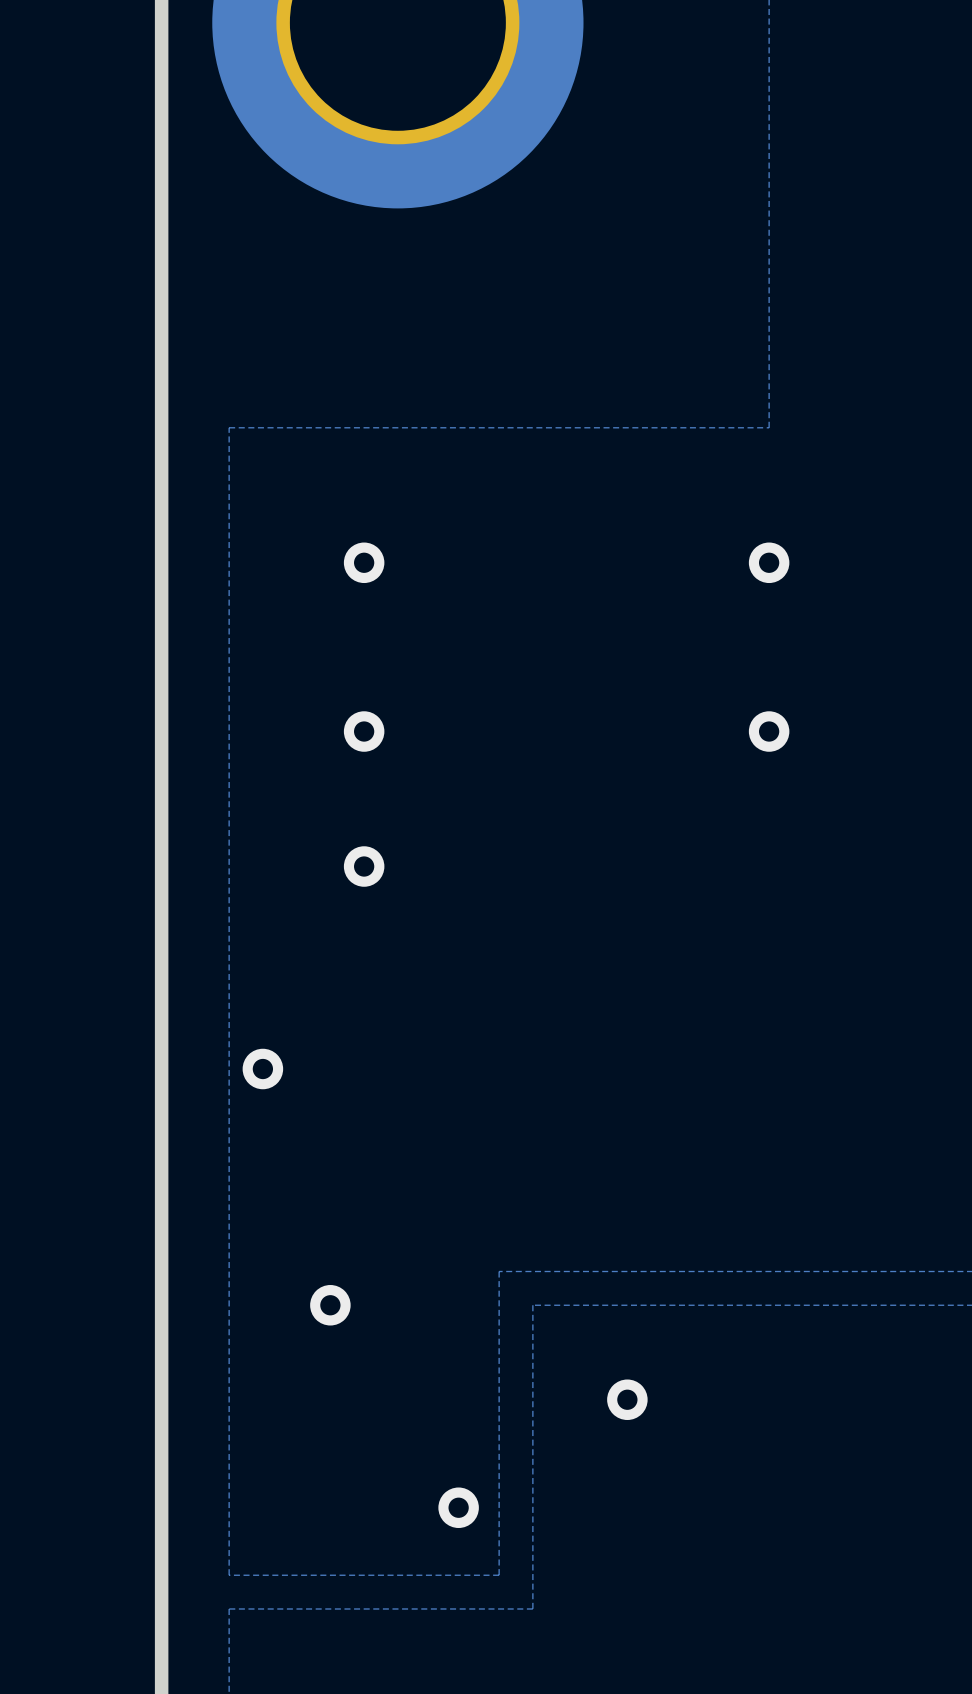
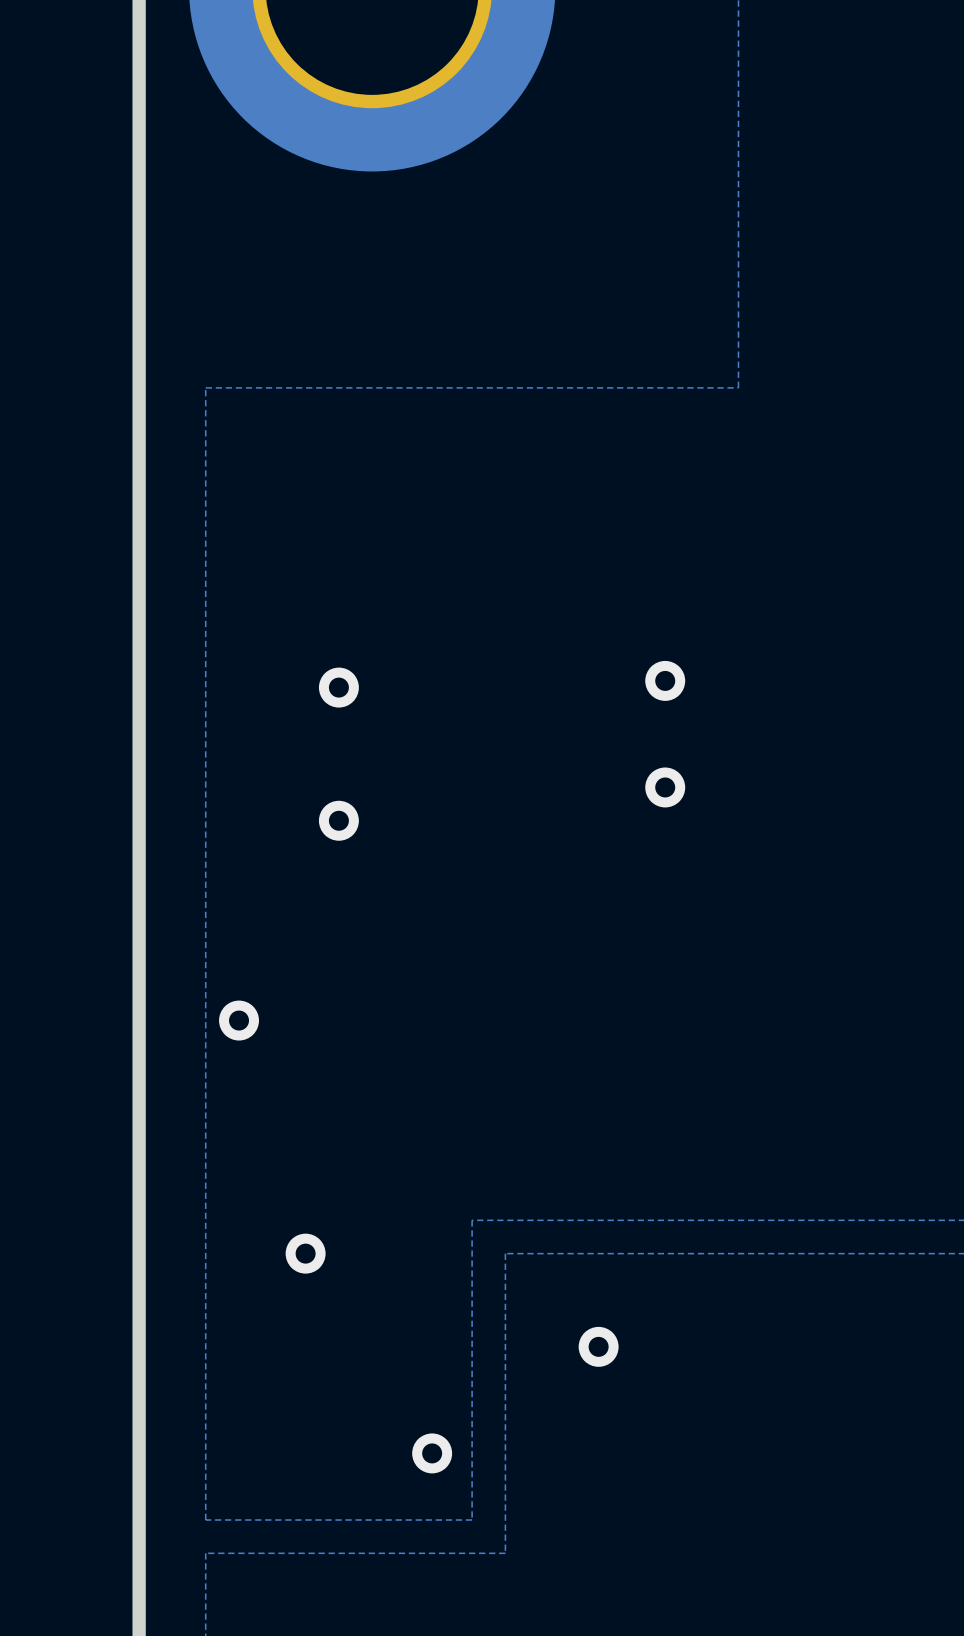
via: (364, 562) -> none
via: (769, 562) -> none
via: none -> (665, 680)
via: (769, 731) -> none
via: none -> (665, 787)

